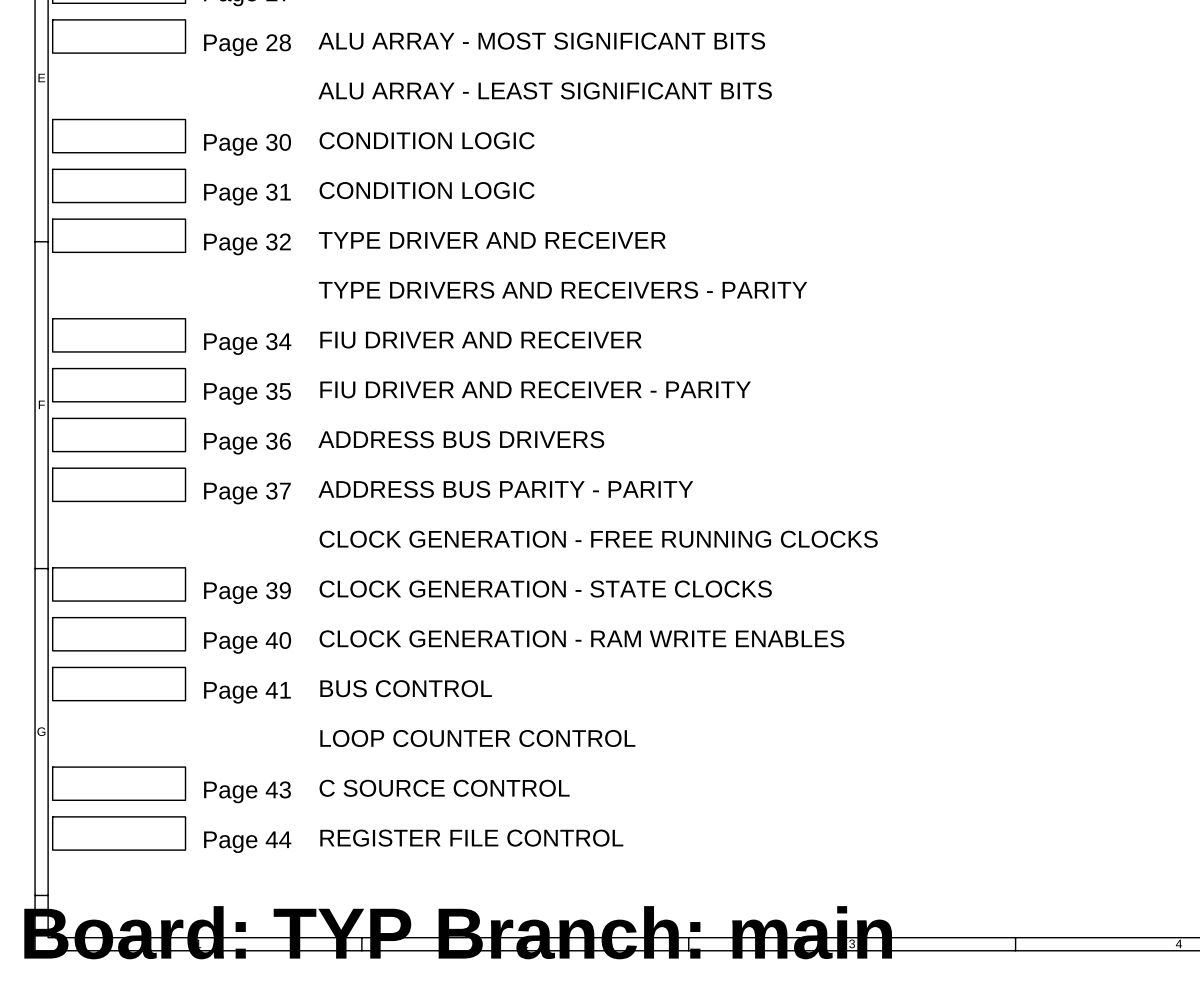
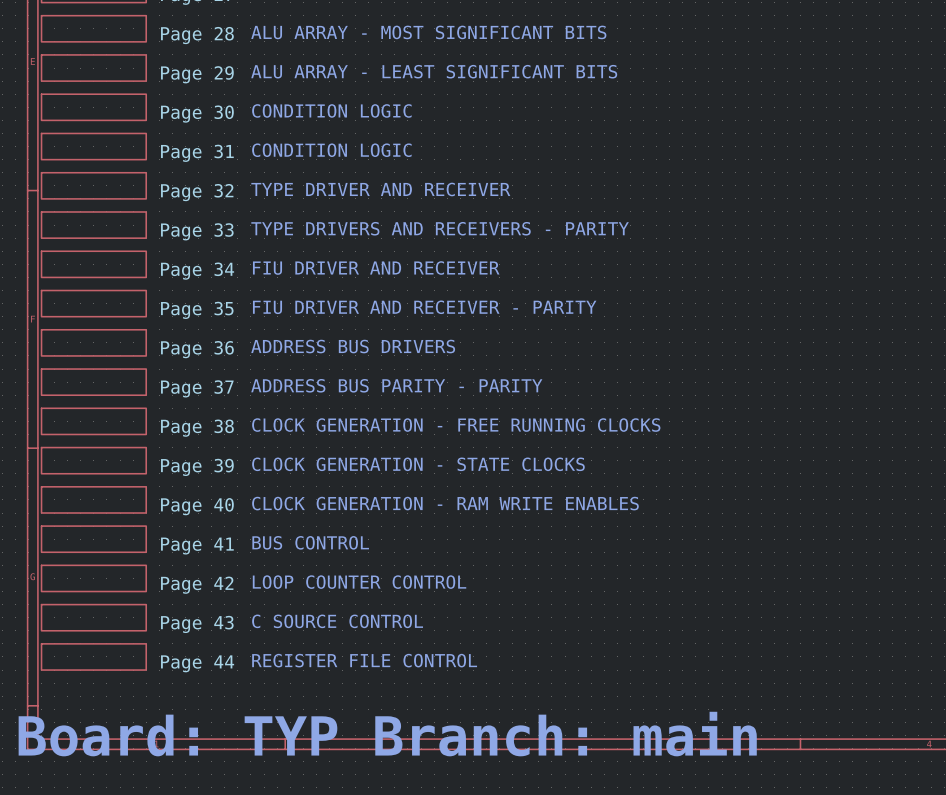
sheet Page 29: none -> (93, 68)
sheet Page 33: none -> (93, 225)
sheet Page 38: none -> (93, 421)
sheet Page 42: none -> (93, 578)

